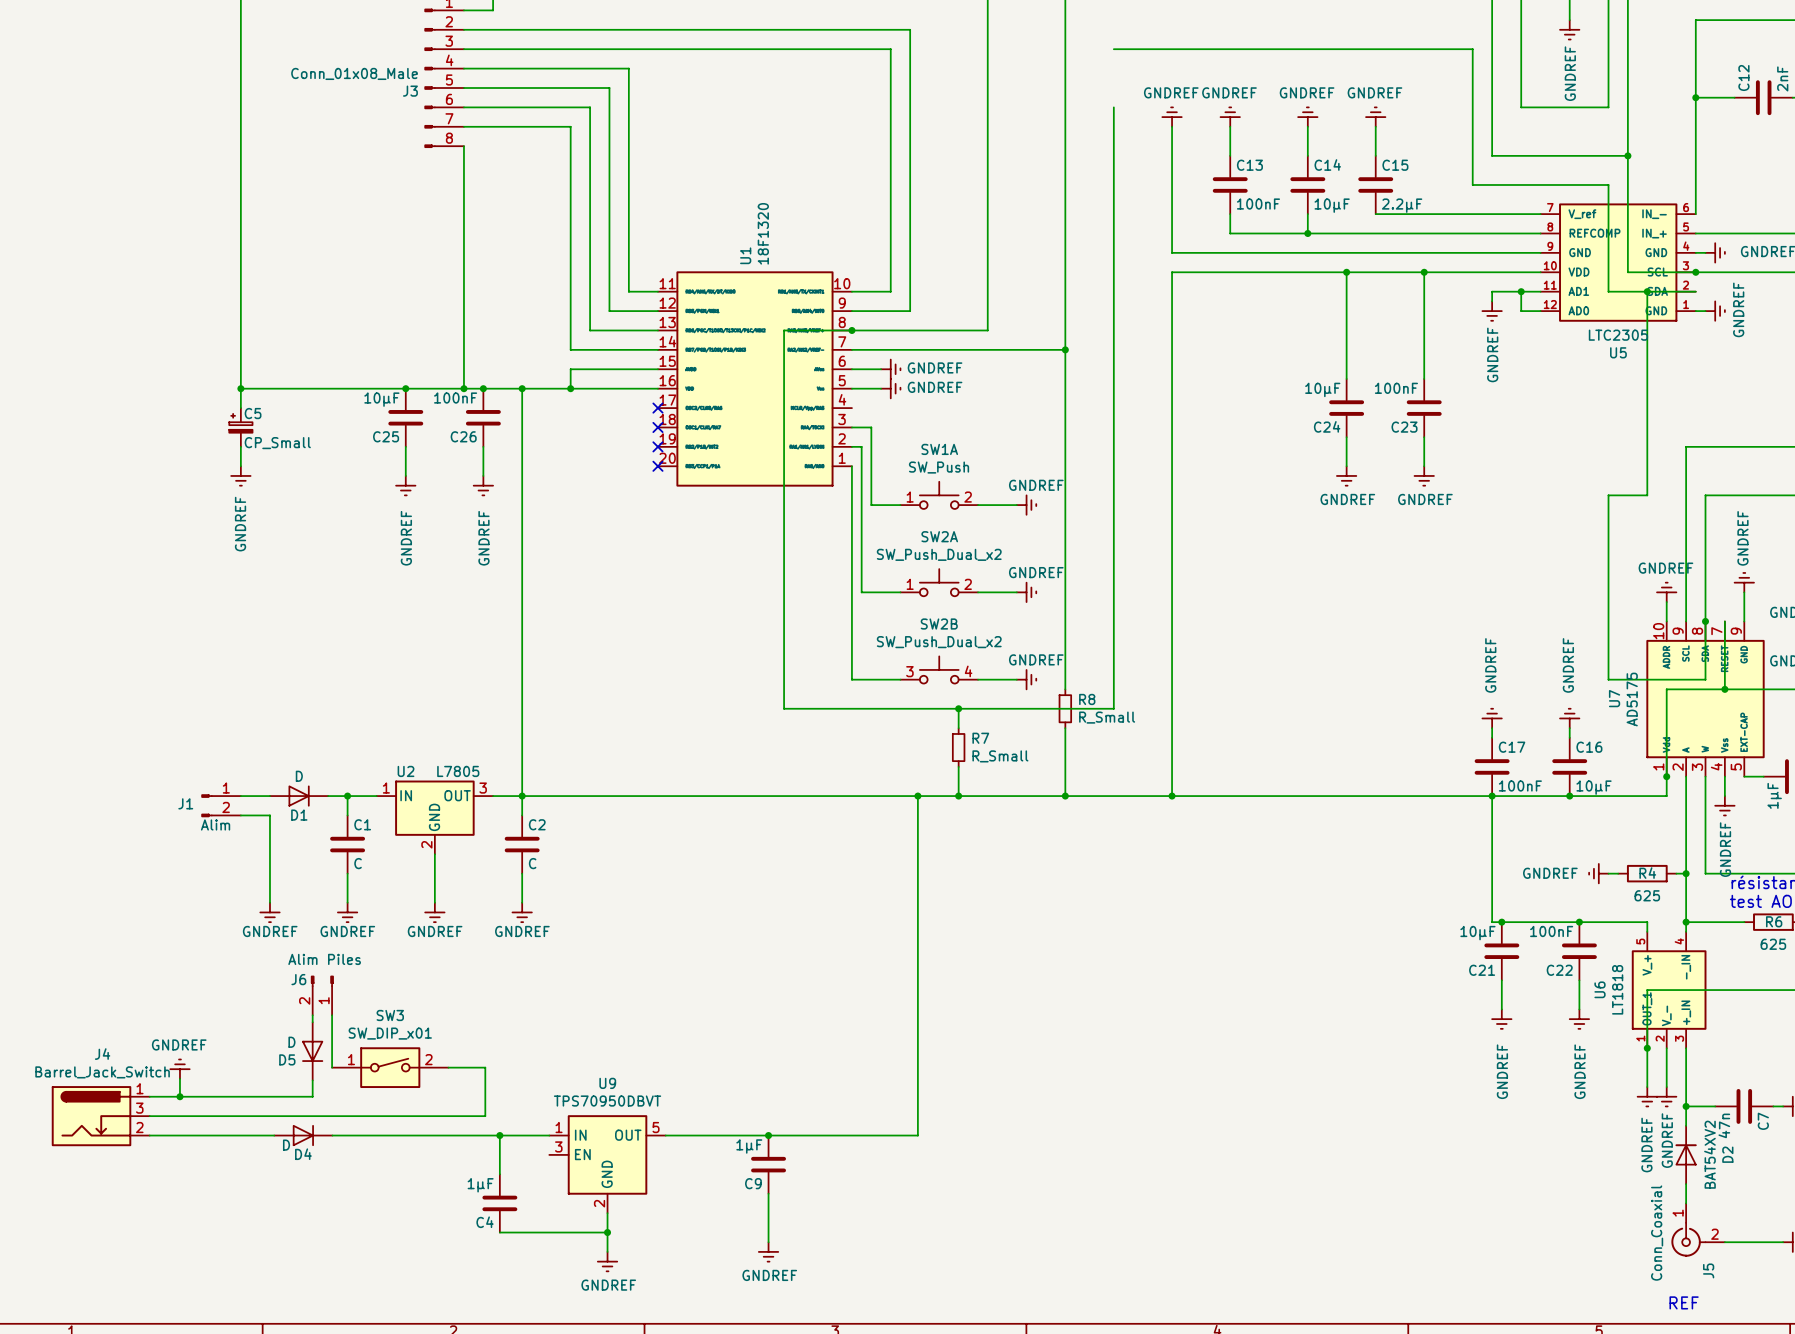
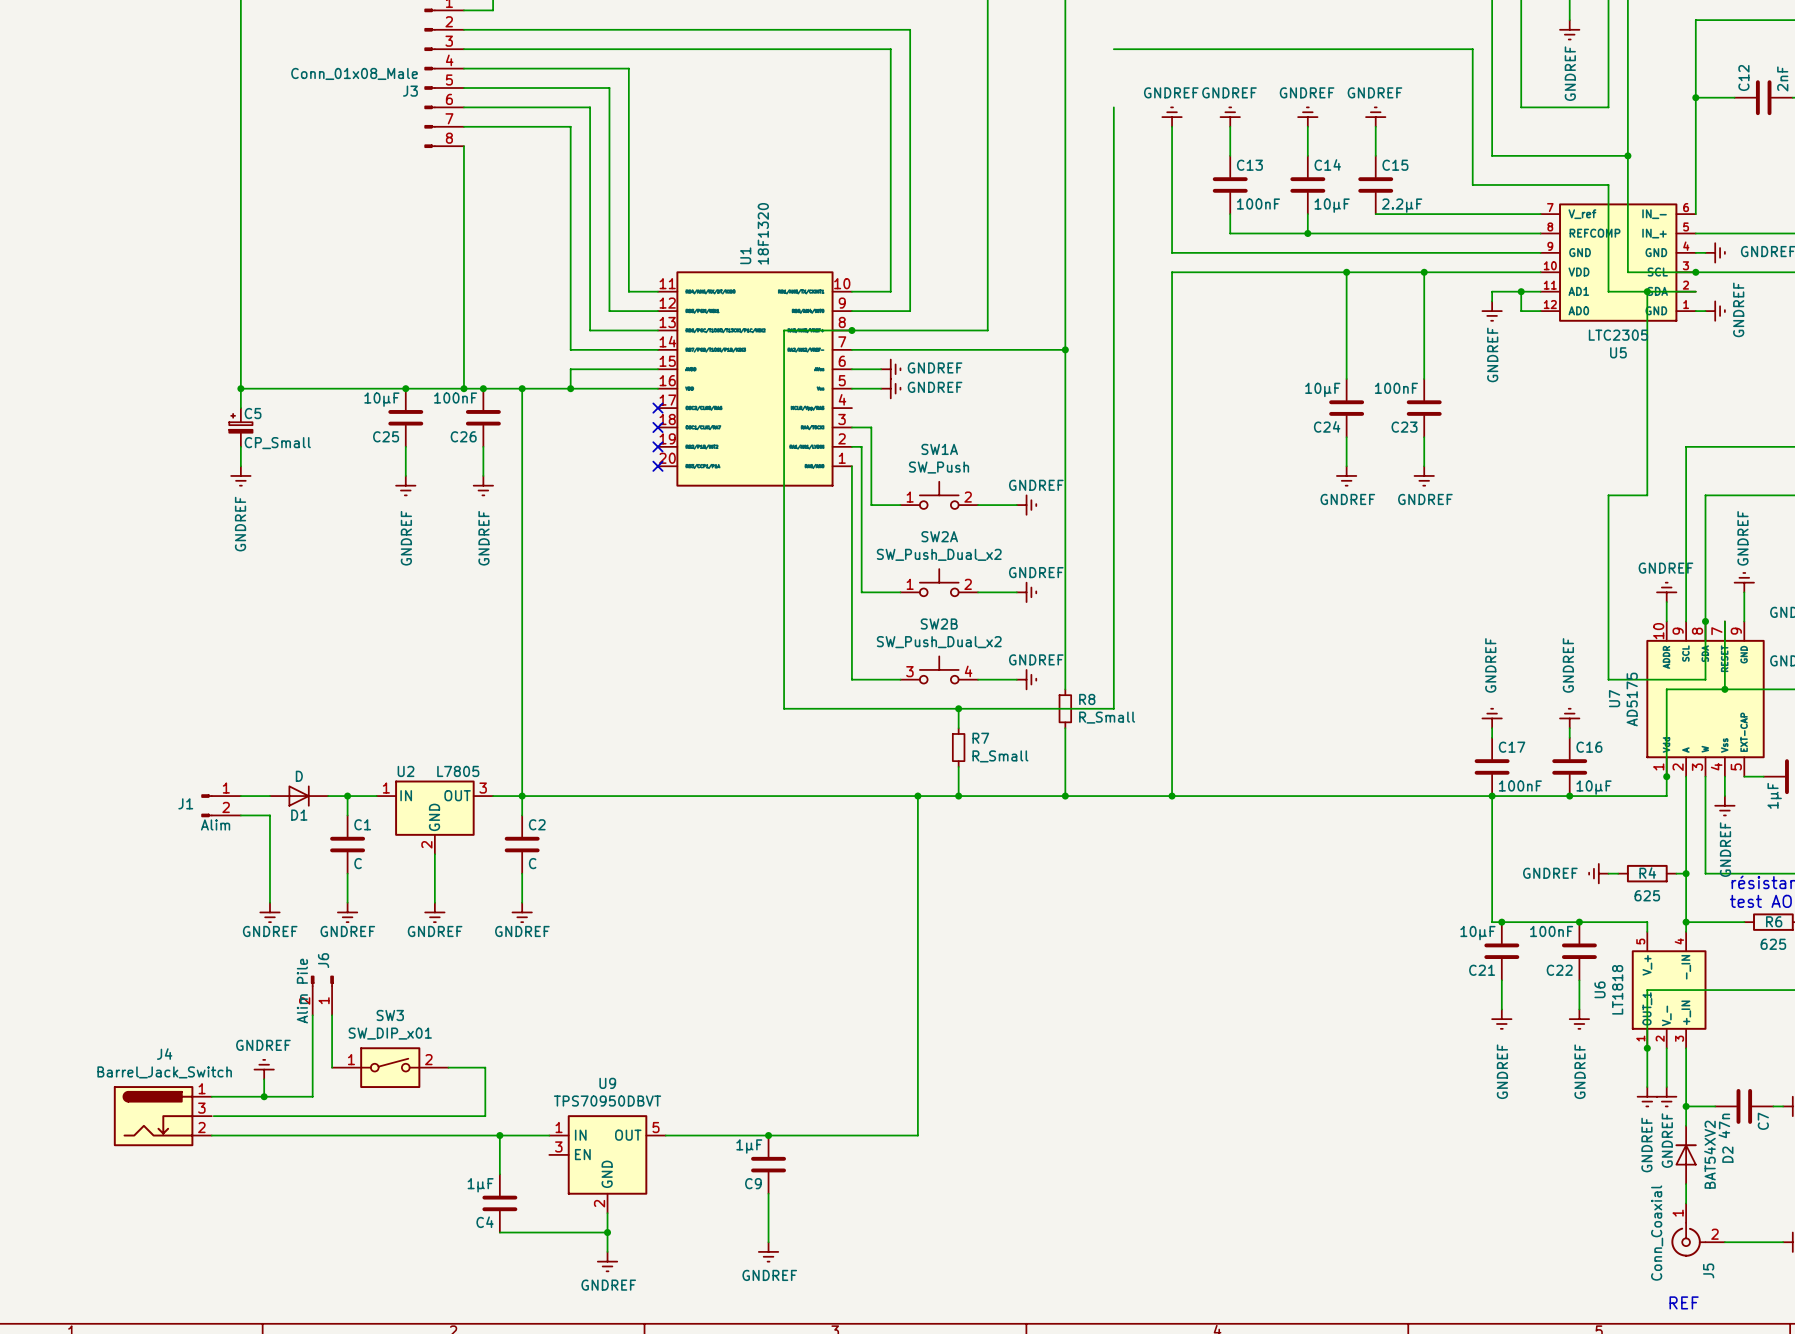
J6 value: Alim Piles (324, 959) -> Alim Pile (302, 991)
J6 name rotation: 0° (298, 979) -> 90° counterclockwise (323, 960)
J6 name position: J6 (298, 979) -> J6 (323, 960)
D5: D (312, 1051) -> none
power symbol position: GNDREF (179, 1069) -> GNDREF (264, 1069)
wire: none -> (264, 1079) (264, 1096)
junction: (179, 1096) -> none
junction: none -> (264, 1096)
J4 position: (100, 1116) -> (162, 1116)
D4: D (303, 1135) -> none

